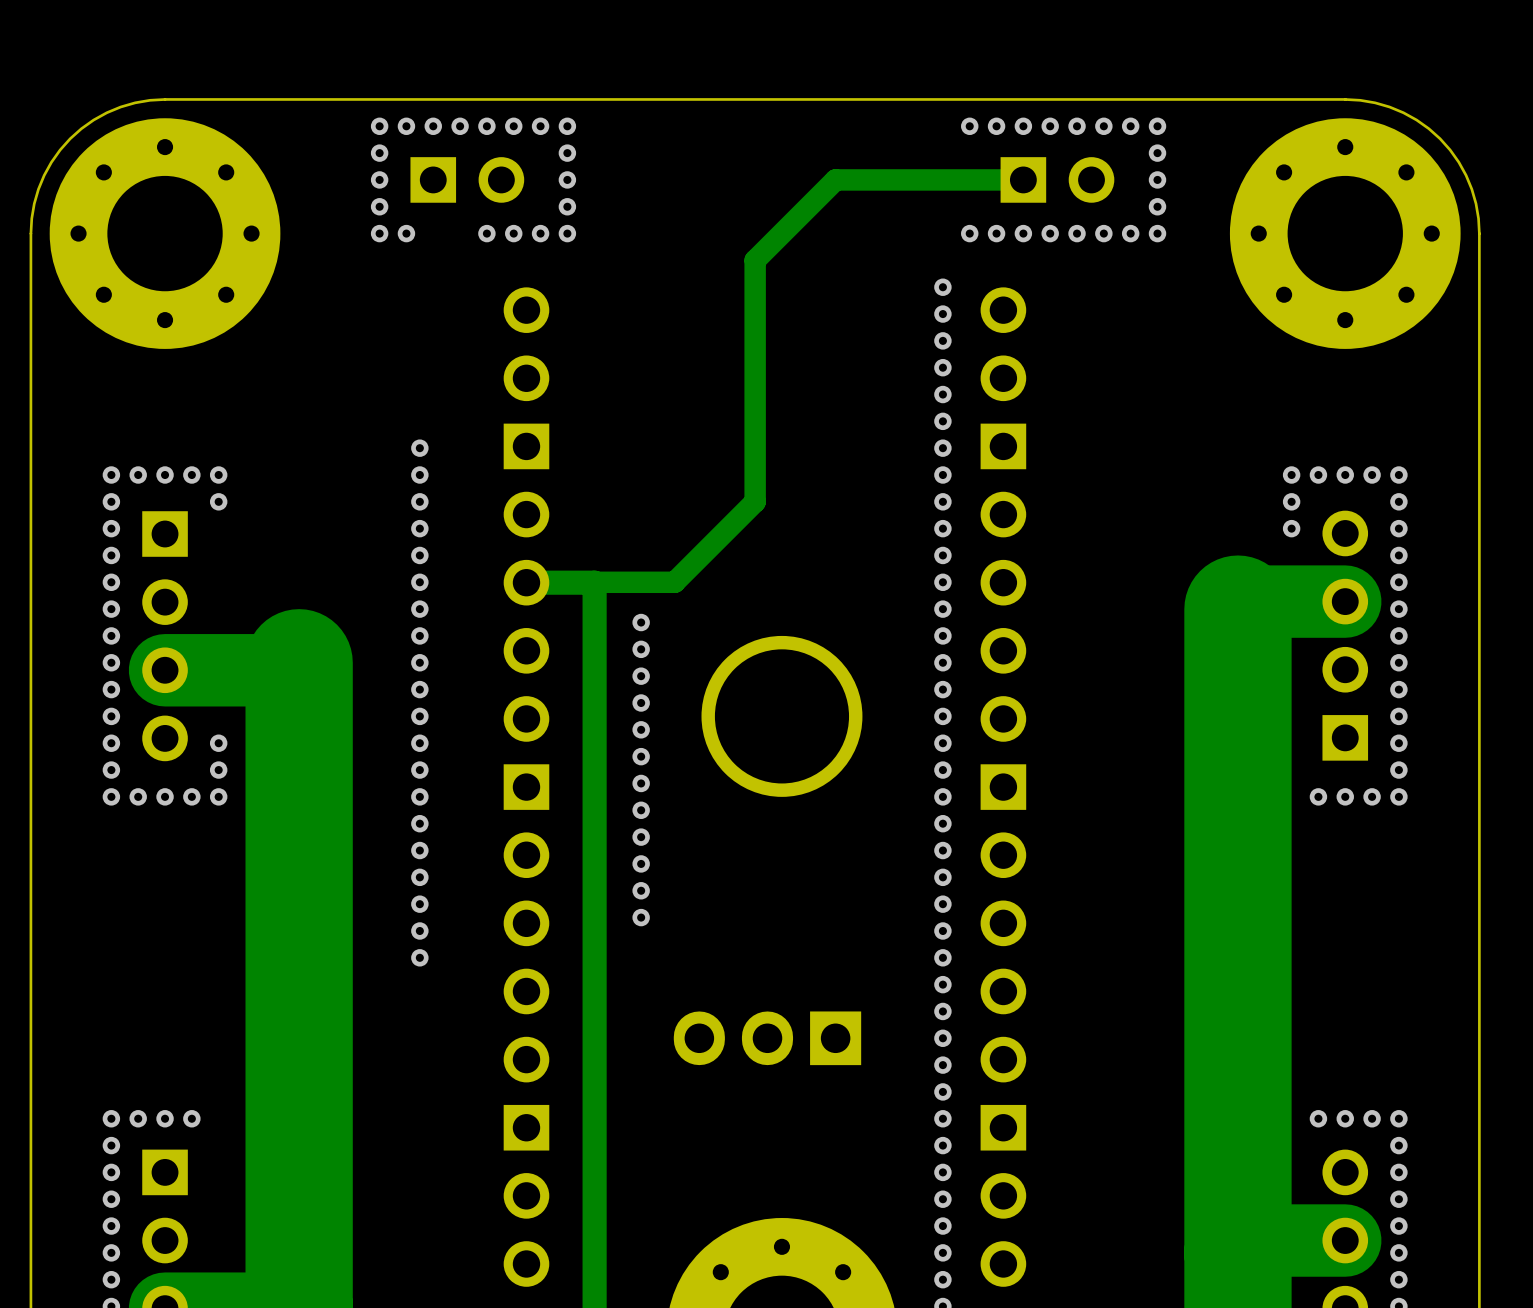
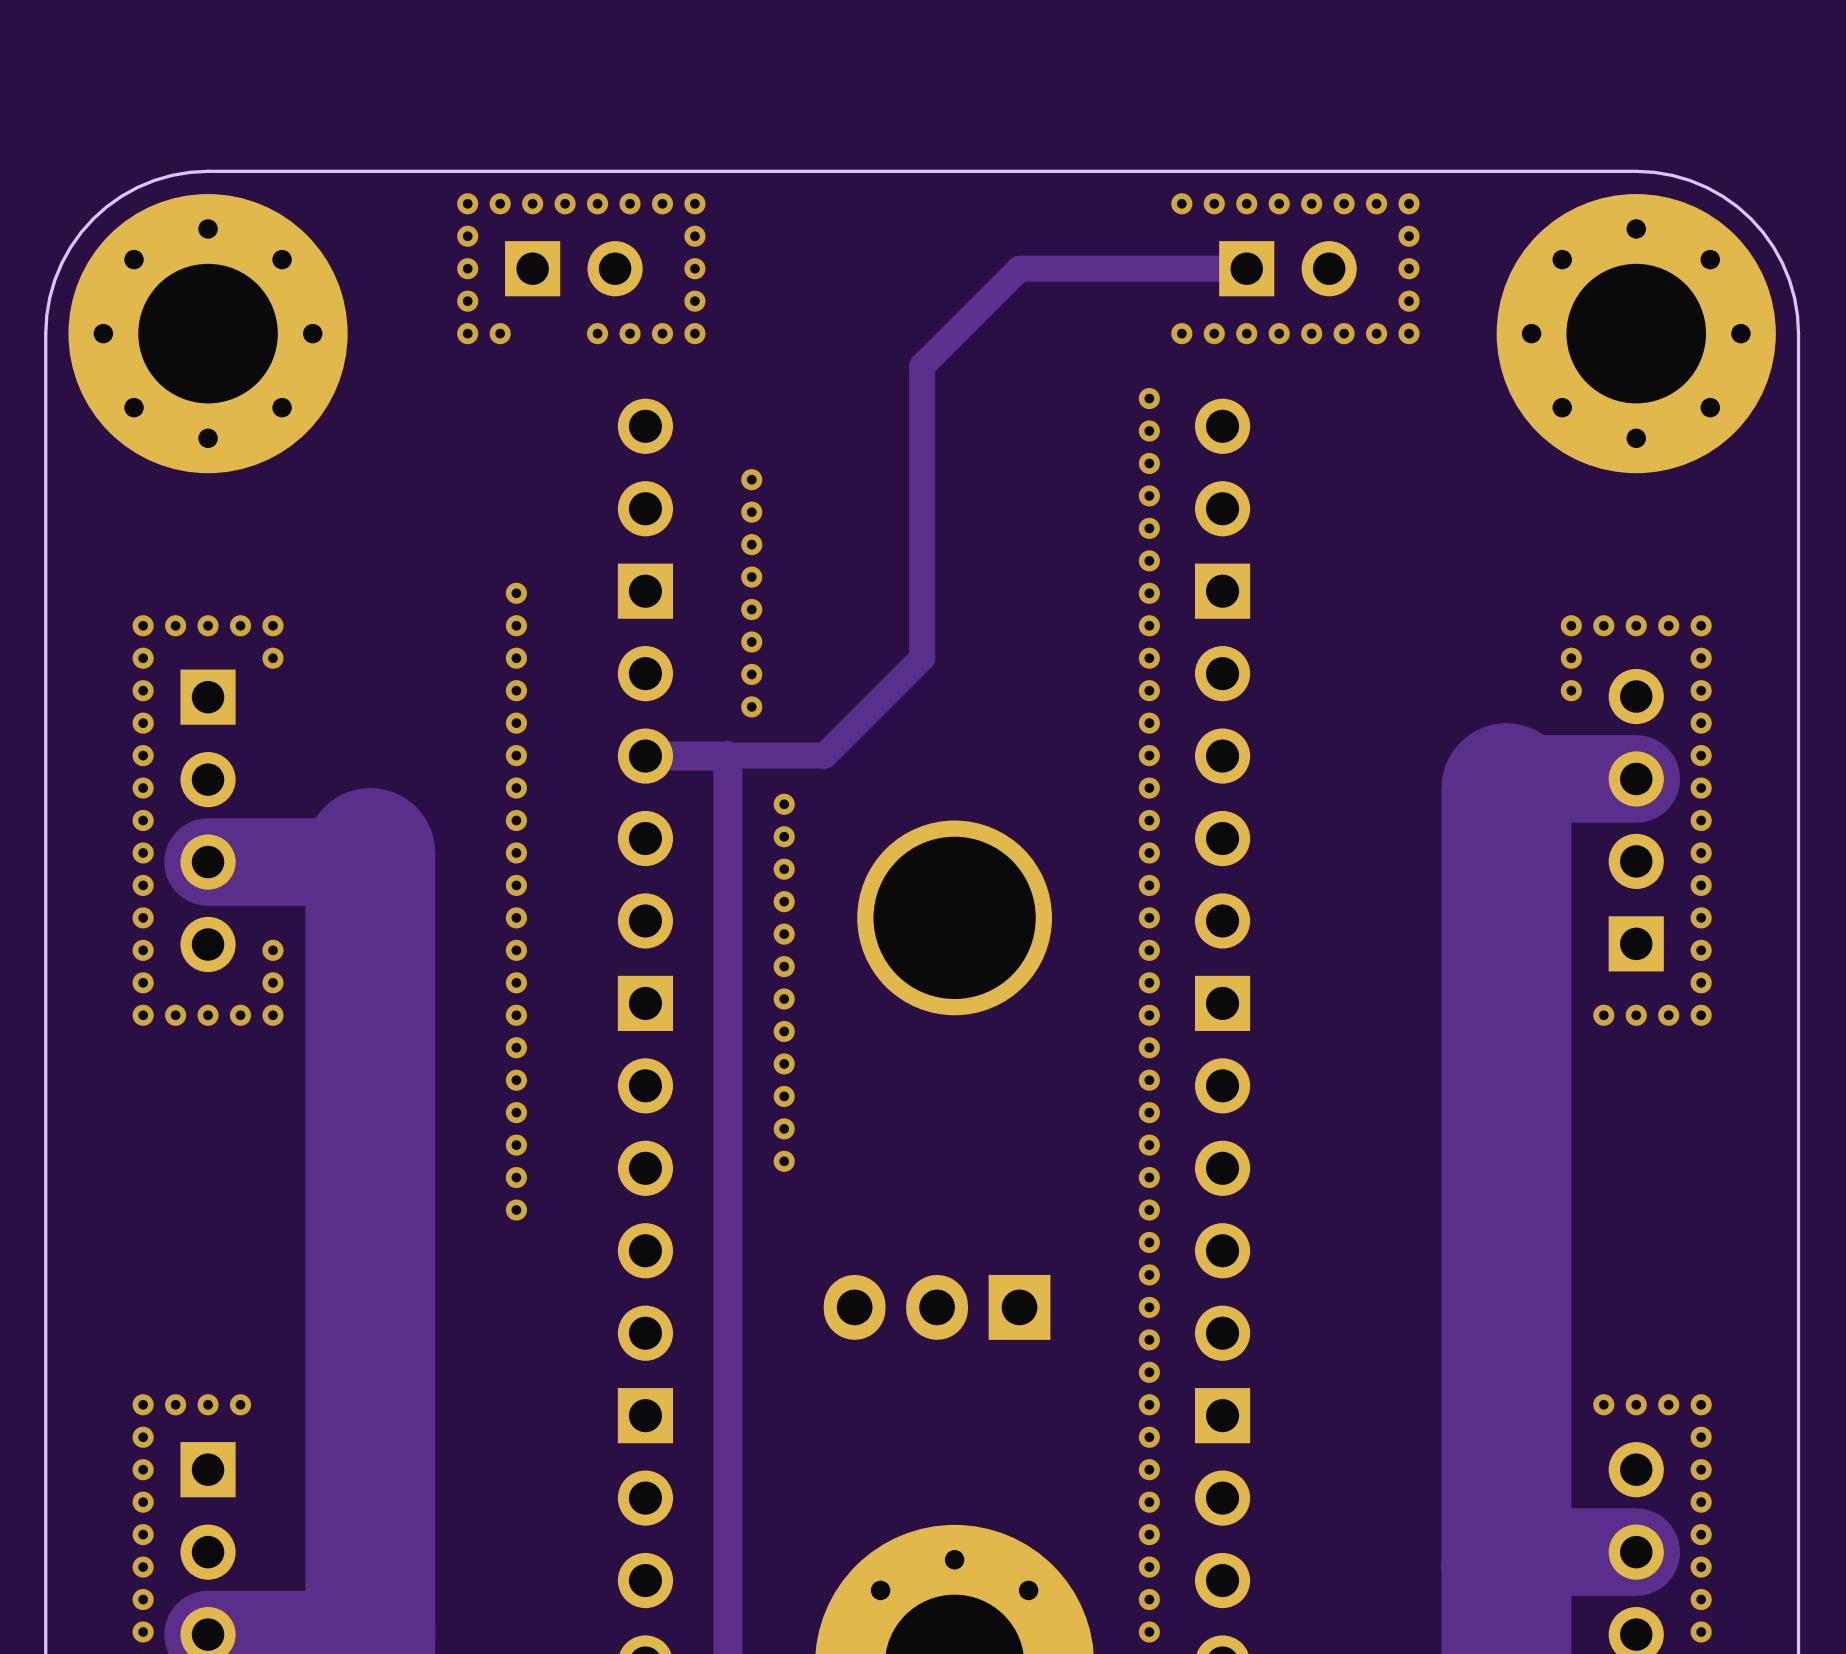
via: none -> (751, 479)
via: none -> (751, 512)
via: none -> (751, 544)
via: none -> (751, 577)
via: none -> (751, 609)
via: none -> (751, 641)
via: none -> (751, 674)
via: none -> (751, 706)

